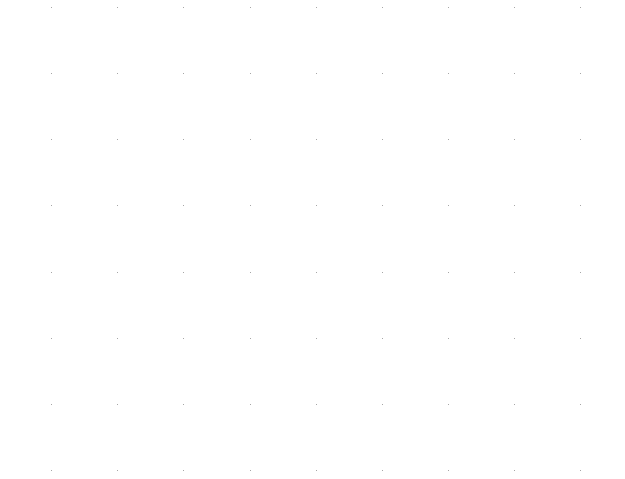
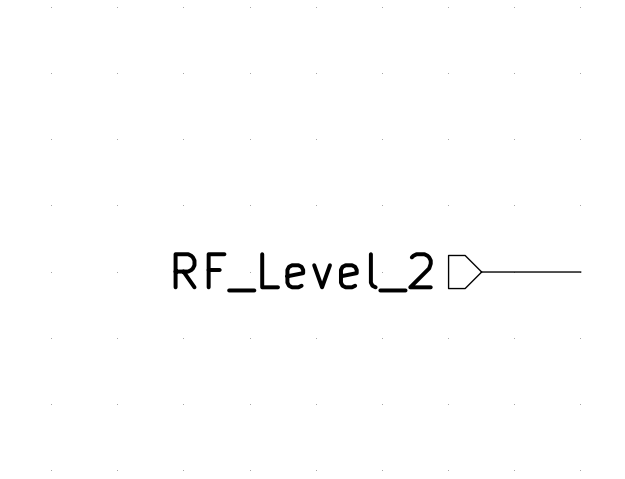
wire: none -> (481, 272) (580, 272)
hierarchical label: none -> RF_Level_2 (303, 272)

